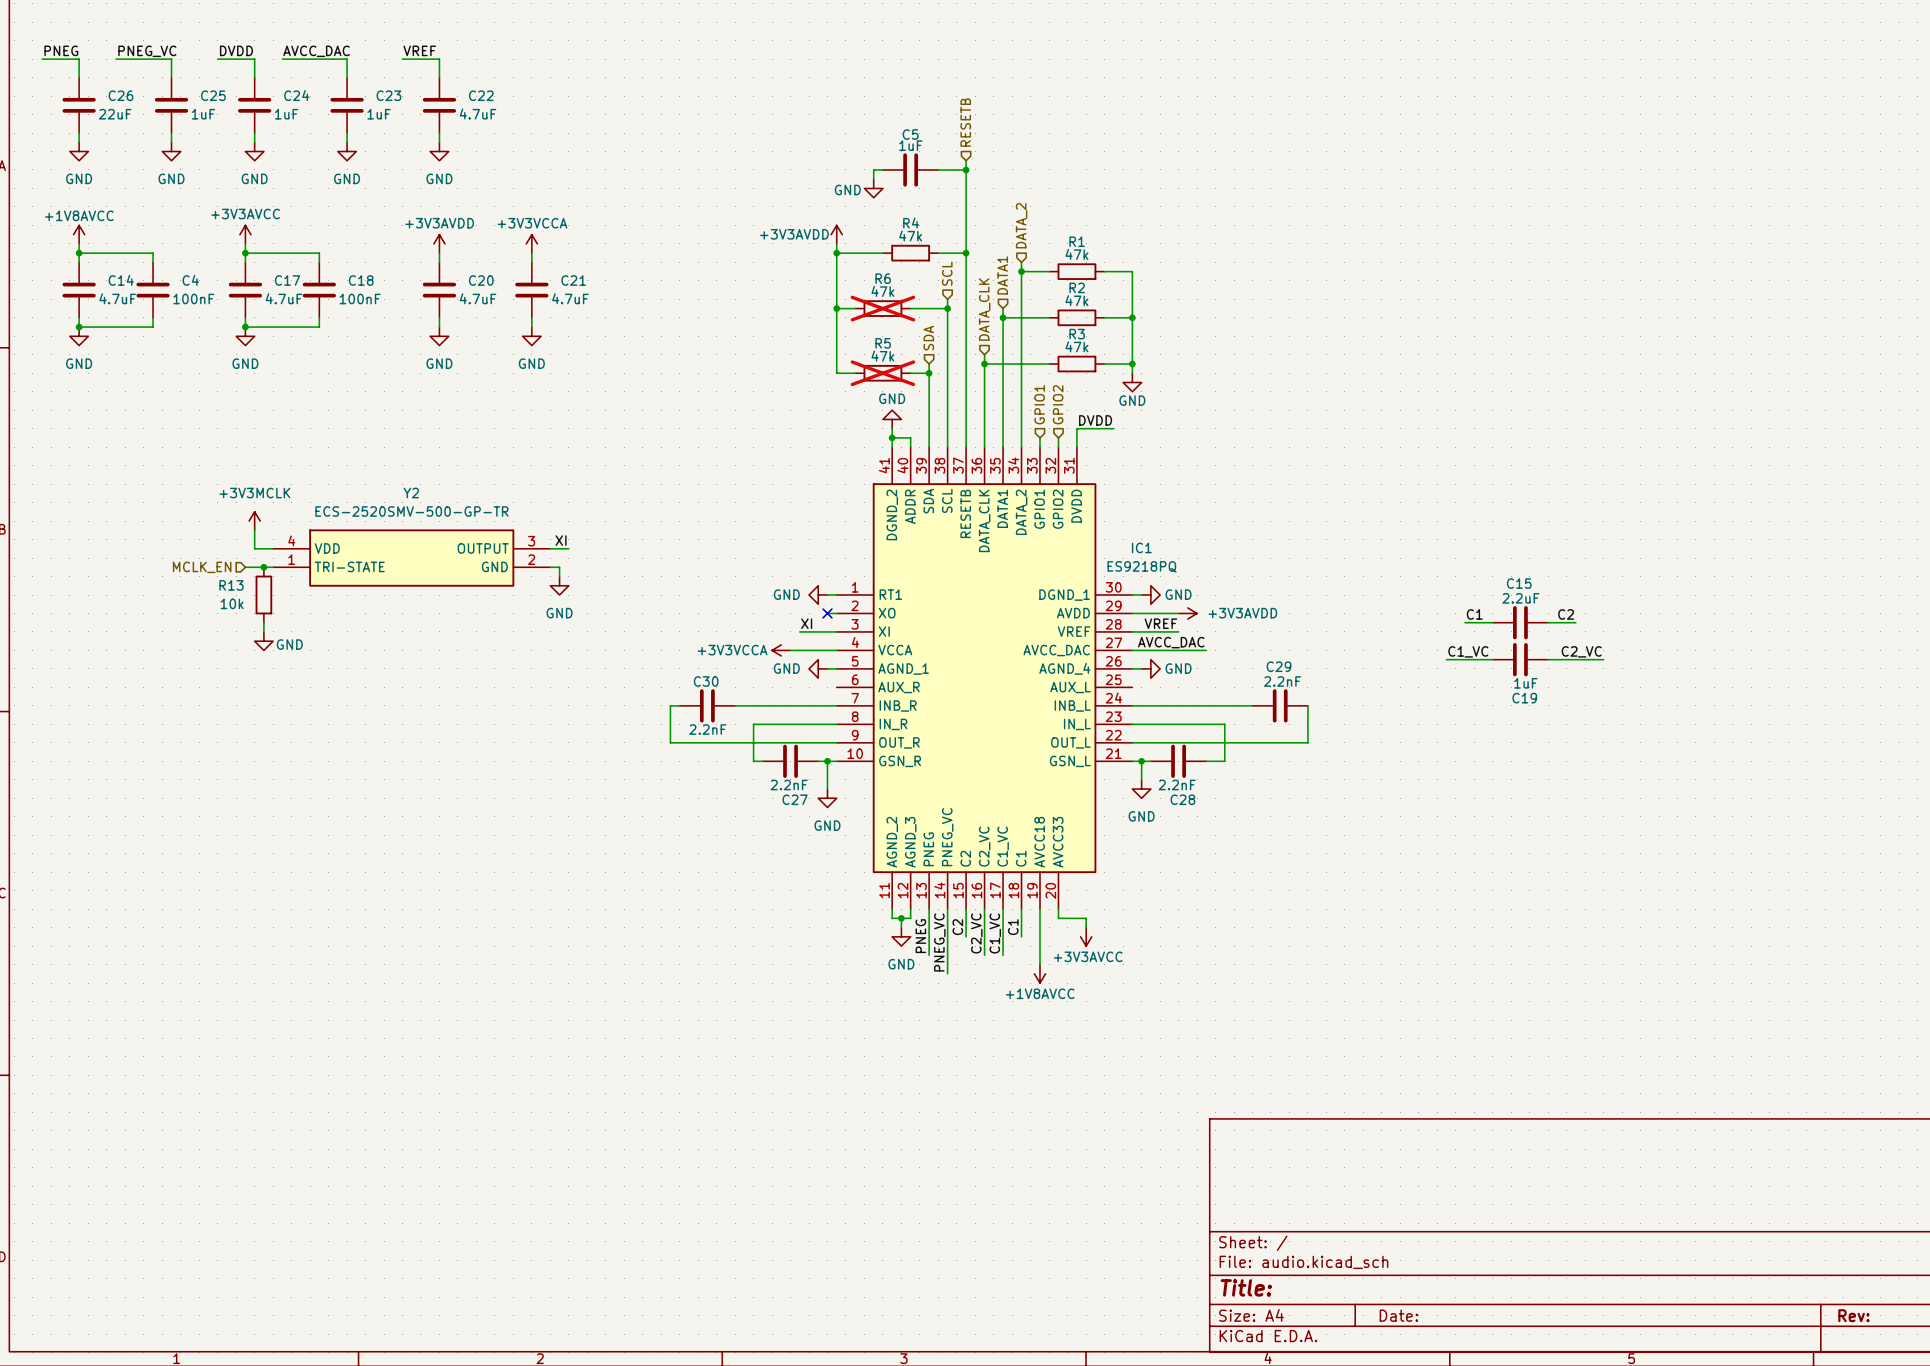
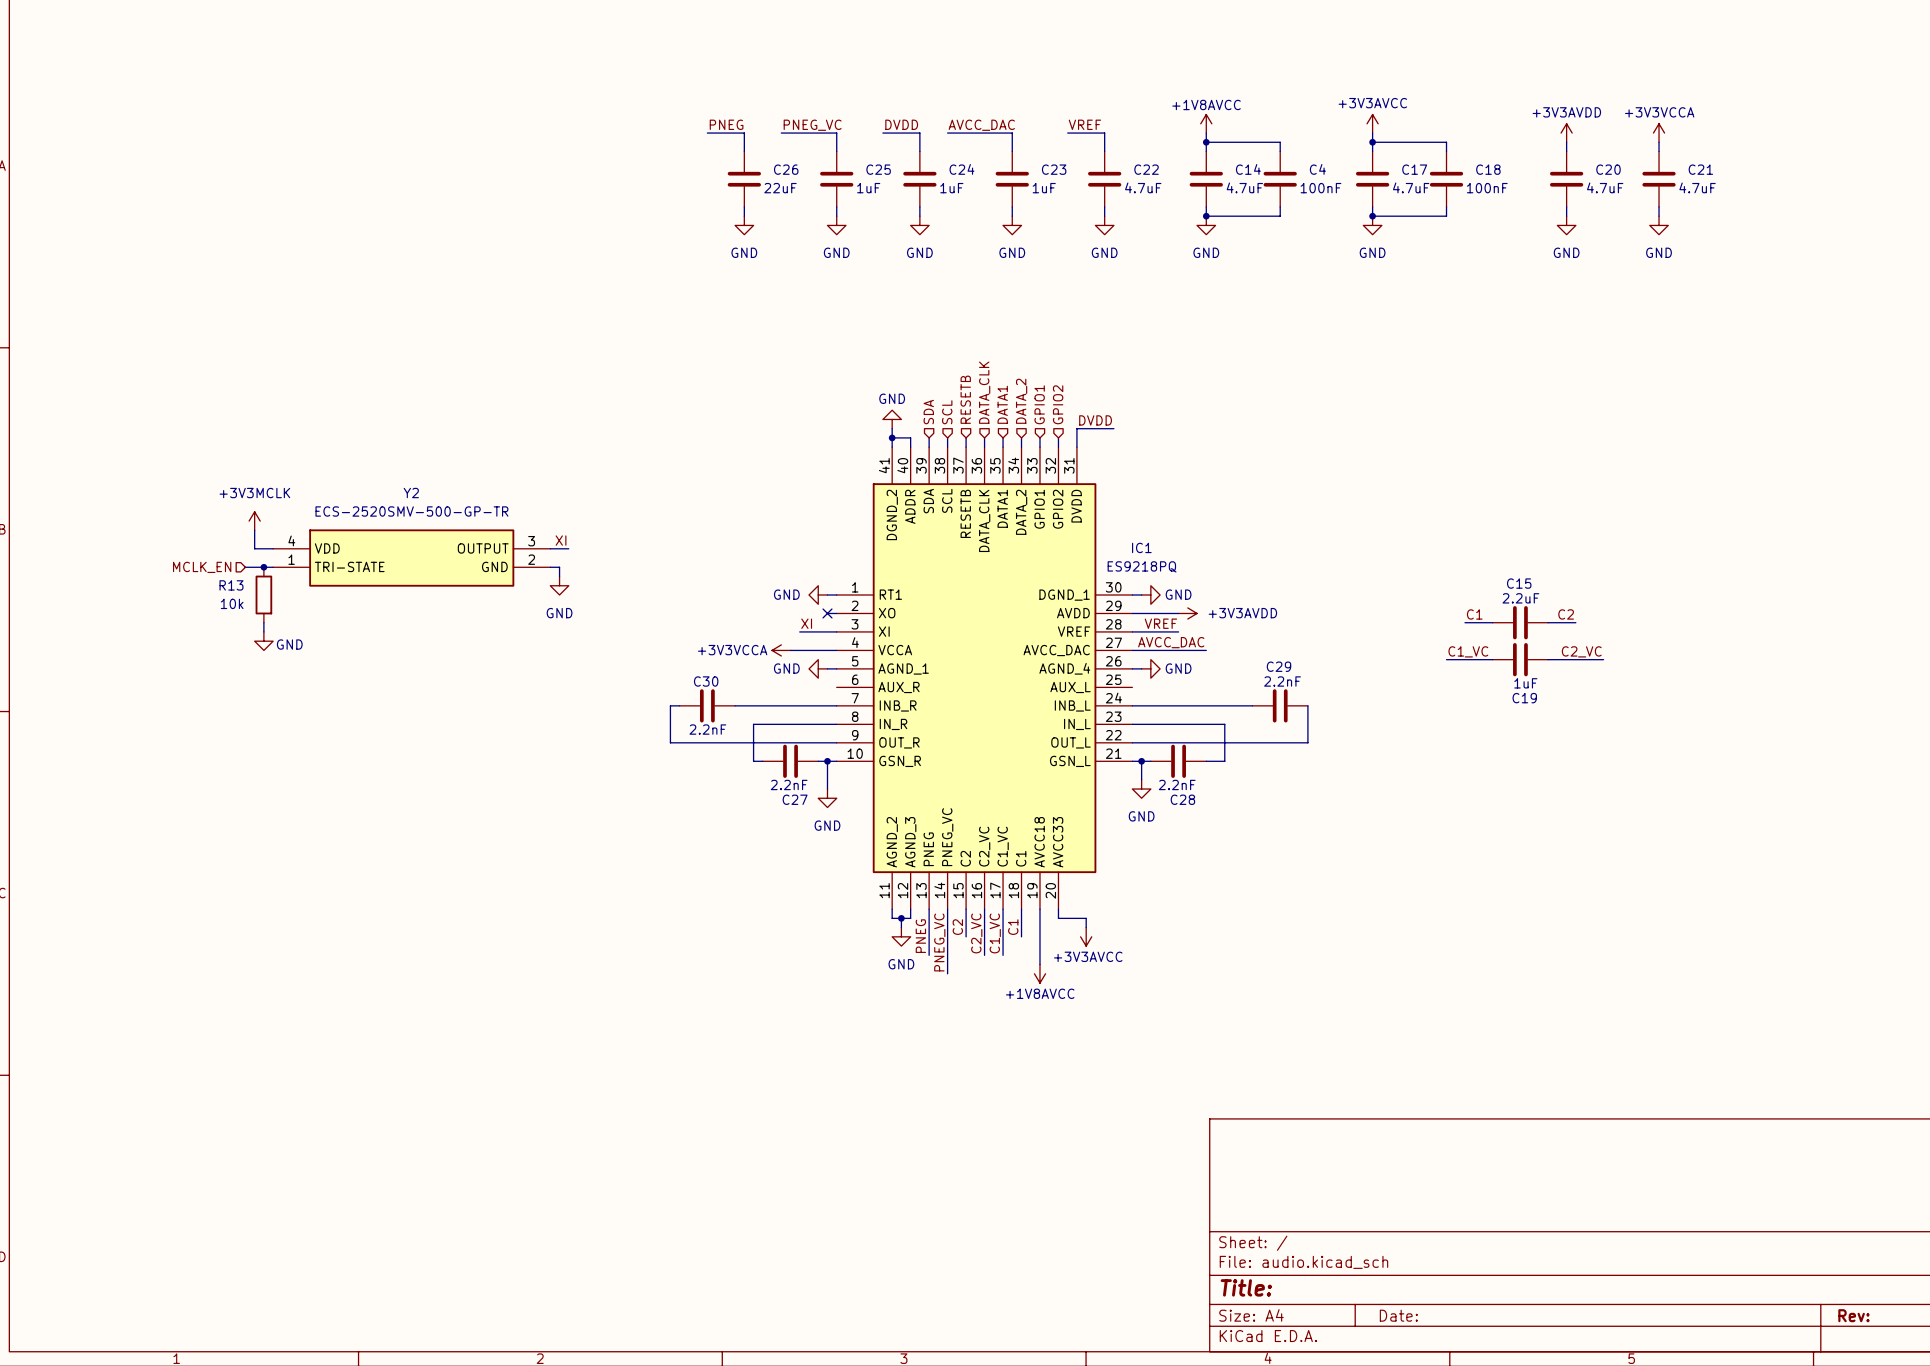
label: PNEG (61, 50) -> none
label: DVDD (236, 50) -> none
label: VREF (419, 50) -> none
label: PNEG_VC (147, 51) -> none
label: AVCC_DAC (316, 51) -> none
wire: (42, 59) (79, 59) (79, 77) -> none
wire: (116, 59) (171, 59) (171, 77) -> none
wire: (217, 59) (254, 59) (254, 77) -> none
wire: (282, 59) (347, 59) (347, 77) -> none
wire: (402, 59) (439, 59) (439, 77) -> none
C26 position: (79, 105) -> (744, 179)
C25 position: (171, 105) -> (836, 179)
C24 position: (254, 105) -> (919, 179)
C23 position: (347, 105) -> (1012, 179)
C22 position: (439, 105) -> (1104, 179)
hierarchical label: RESETB (965, 122) -> none
power symbol: none -> +1V8AVCC (1206, 123)
power symbol: none -> +3V3AVCC (1372, 123)
label: none -> PNEG (726, 124)
label: none -> DVDD (901, 124)
label: none -> VREF (1084, 124)
label: none -> PNEG_VC (812, 125)
label: none -> AVCC_DAC (981, 125)
wire: (79, 133) (79, 142) -> none
wire: (171, 133) (171, 142) -> none
wire: (254, 133) (254, 142) -> none
wire: (347, 133) (347, 142) -> none
wire: (439, 133) (439, 142) -> none
wire: none -> (707, 133) (744, 133) (744, 151)
wire: none -> (781, 133) (836, 133) (836, 151)
wire: none -> (882, 133) (919, 133) (919, 151)
wire: none -> (947, 133) (1012, 133) (1012, 151)
wire: none -> (1067, 133) (1104, 133) (1104, 151)
wire: none -> (1206, 133) (1206, 151)
wire: none -> (1372, 133) (1372, 151)
power symbol: none -> +3V3AVDD (1566, 133)
power symbol: none -> +3V3VCCA (1659, 133)
wire: none -> (1206, 142) (1280, 142) (1280, 151)
junction: none -> (1206, 142)
wire: none -> (1372, 142) (1446, 142) (1446, 151)
junction: none -> (1372, 142)
wire: none -> (1566, 142) (1566, 151)
wire: none -> (1659, 142) (1659, 151)
power symbol: GND (79, 151) -> none
power symbol: GND (171, 151) -> none
power symbol: GND (254, 151) -> none
power symbol: GND (347, 151) -> none
power symbol: GND (439, 151) -> none
wire: (966, 160) (966, 437) -> none
wire: (882, 169) (873, 169) (873, 179) -> none
C5: 1uF (910, 169) -> none
wire: (938, 169) (966, 169) -> none
junction: (966, 169) -> none
power symbol: GND (873, 188) -> none
wire: none -> (744, 206) (744, 216)
wire: none -> (836, 206) (836, 216)
wire: none -> (919, 206) (919, 216)
wire: none -> (1012, 206) (1012, 216)
wire: none -> (1104, 206) (1104, 216)
wire: none -> (1206, 206) (1206, 216) (1280, 216) (1280, 206)
wire: none -> (1372, 206) (1372, 216) (1446, 216) (1446, 206)
wire: none -> (1566, 206) (1566, 216)
wire: none -> (1659, 206) (1659, 216)
junction: none -> (1206, 216)
junction: none -> (1372, 216)
power symbol: none -> GND (744, 225)
power symbol: none -> GND (836, 225)
power symbol: none -> GND (919, 225)
power symbol: none -> GND (1012, 225)
hierarchical label position: DATA_2 (1021, 225) -> DATA_2 (1021, 401)
power symbol: none -> GND (1104, 225)
power symbol: none -> GND (1206, 225)
power symbol: none -> GND (1372, 225)
power symbol: none -> GND (1566, 225)
power symbol: none -> GND (1659, 225)
power symbol: +1V8AVCC (79, 234) -> none
power symbol: +3V3AVCC (245, 234) -> none
power symbol: +3V3AVDD (836, 234) -> none
wire: (79, 243) (79, 262) -> none
wire: (245, 243) (245, 262) -> none
power symbol: +3V3AVDD (439, 243) -> none
power symbol: +3V3VCCA (531, 243) -> none
wire: (836, 243) (836, 373) (855, 373) -> none
wire: (79, 253) (153, 253) (153, 262) -> none
junction: (79, 253) -> none
wire: (245, 253) (319, 253) (319, 262) -> none
junction: (245, 253) -> none
wire: (439, 253) (439, 262) -> none
wire: (531, 253) (531, 262) -> none
wire: (836, 253) (882, 253) -> none
junction: (836, 253) -> none
R4: 47k (910, 253) -> none
wire: (938, 253) (966, 253) -> none
junction: (966, 253) -> none
wire: (1021, 262) (1021, 437) -> none
wire: (1021, 271) (1049, 271) -> none
junction: (1021, 271) -> none
R1: 47k (1076, 271) -> none
wire: (1104, 271) (1132, 271) (1132, 373) -> none
hierarchical label position: SCL (947, 273) -> SCL (947, 412)
hierarchical label position: DATA1 (1002, 275) -> DATA1 (1002, 404)
C14 position: (79, 290) -> (1206, 179)
C4 position: (153, 290) -> (1280, 179)
C17 position: (245, 290) -> (1372, 179)
C18 position: (319, 290) -> (1446, 179)
C20 position: (439, 290) -> (1566, 179)
C21 position: (531, 290) -> (1659, 179)
wire: (947, 299) (947, 437) -> none
wire: (836, 308) (855, 308) -> none
junction: (836, 308) -> none
R6: 47k (882, 308) -> none
wire: (910, 308) (947, 308) -> none
junction: (947, 308) -> none
wire: (1003, 308) (1003, 437) -> none
hierarchical label position: DATA_CLK (984, 309) -> DATA_CLK (984, 392)
wire: (79, 317) (79, 327) (153, 327) (153, 317) -> none
wire: (245, 317) (245, 327) (319, 327) (319, 317) -> none
wire: (439, 317) (439, 327) -> none
wire: (531, 317) (531, 327) -> none
wire: (1003, 317) (1049, 317) -> none
junction: (1003, 317) -> none
R2: 47k (1076, 317) -> none
wire: (1104, 317) (1132, 317) -> none
junction: (1132, 317) -> none
junction: (79, 327) -> none
junction: (245, 327) -> none
power symbol: GND (79, 336) -> none
power symbol: GND (245, 336) -> none
power symbol: GND (439, 336) -> none
power symbol: GND (531, 336) -> none
hierarchical label position: SDA (928, 338) -> SDA (928, 412)
wire: (984, 354) (984, 437) -> none
wire: (929, 364) (929, 437) -> none
wire: (984, 364) (1049, 364) -> none
junction: (984, 364) -> none
R3: 47k (1076, 364) -> none
wire: (1104, 364) (1132, 364) -> none
junction: (1132, 364) -> none
R5: 47k (882, 373) -> none
wire: (910, 373) (929, 373) -> none
junction: (929, 373) -> none
power symbol: GND (1132, 382) -> none
hierarchical label: none -> RESETB (965, 399)

